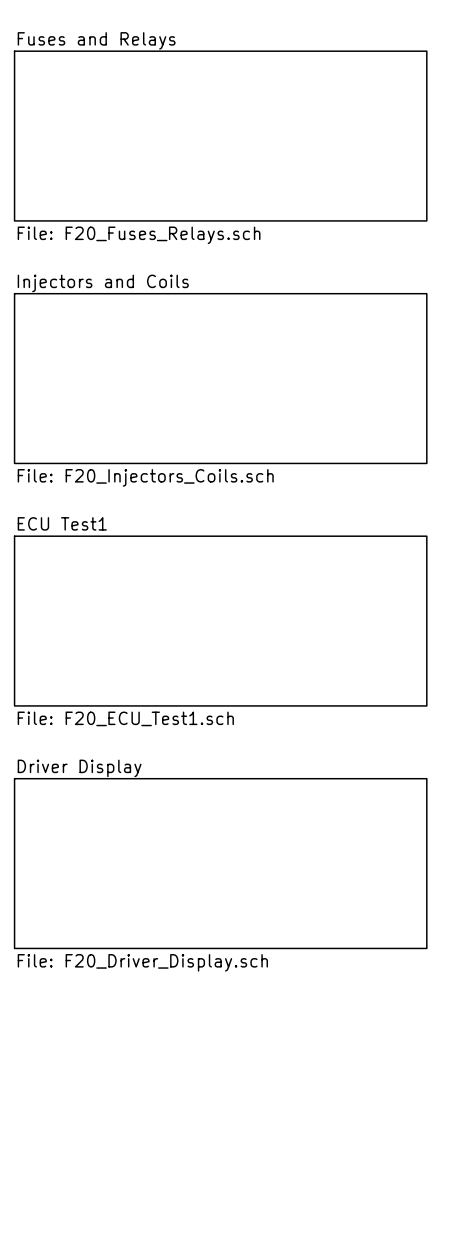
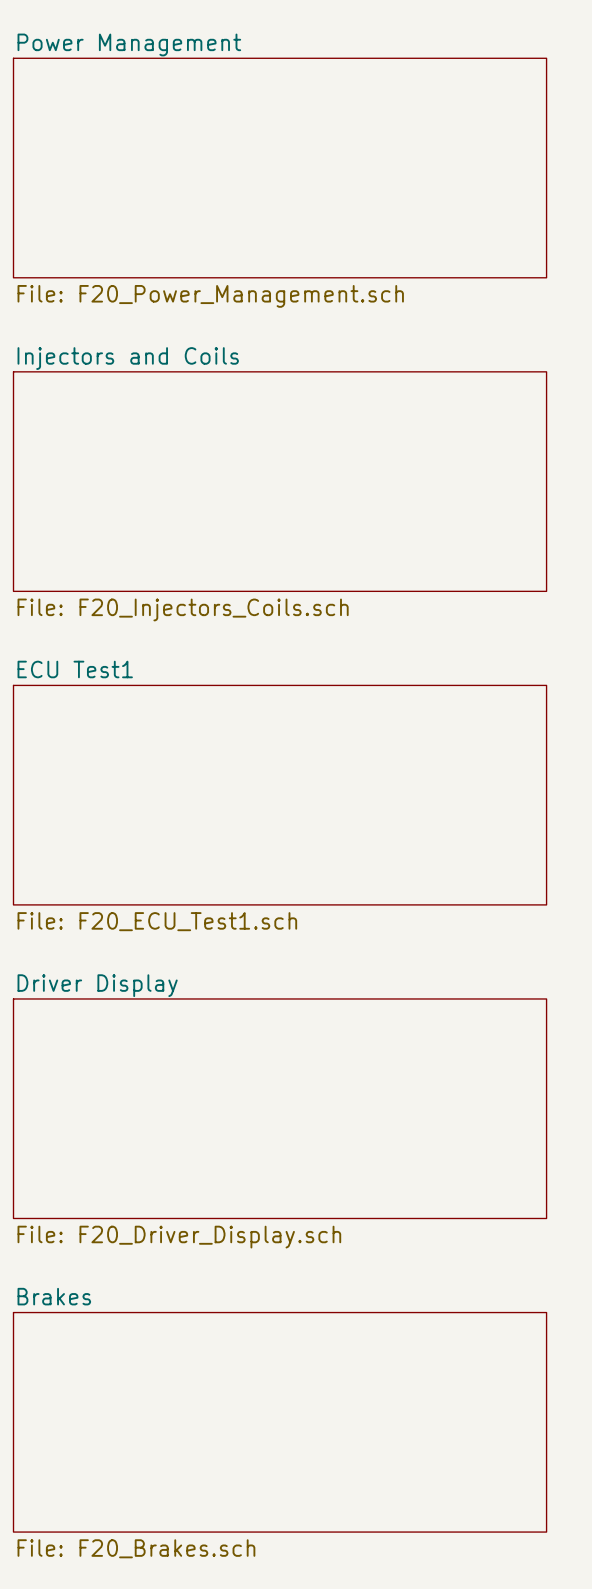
sheet Fuses and Relays name: Fuses and Relays (96, 40) -> Power Management (129, 44)
sheet Fuses and Relays value: File: F20_Fuses_Relays.sch (139, 235) -> File: F20_Power_Management.sch (210, 296)
sheet Brakes: none -> File: F20_Brakes.sch (280, 1422)

